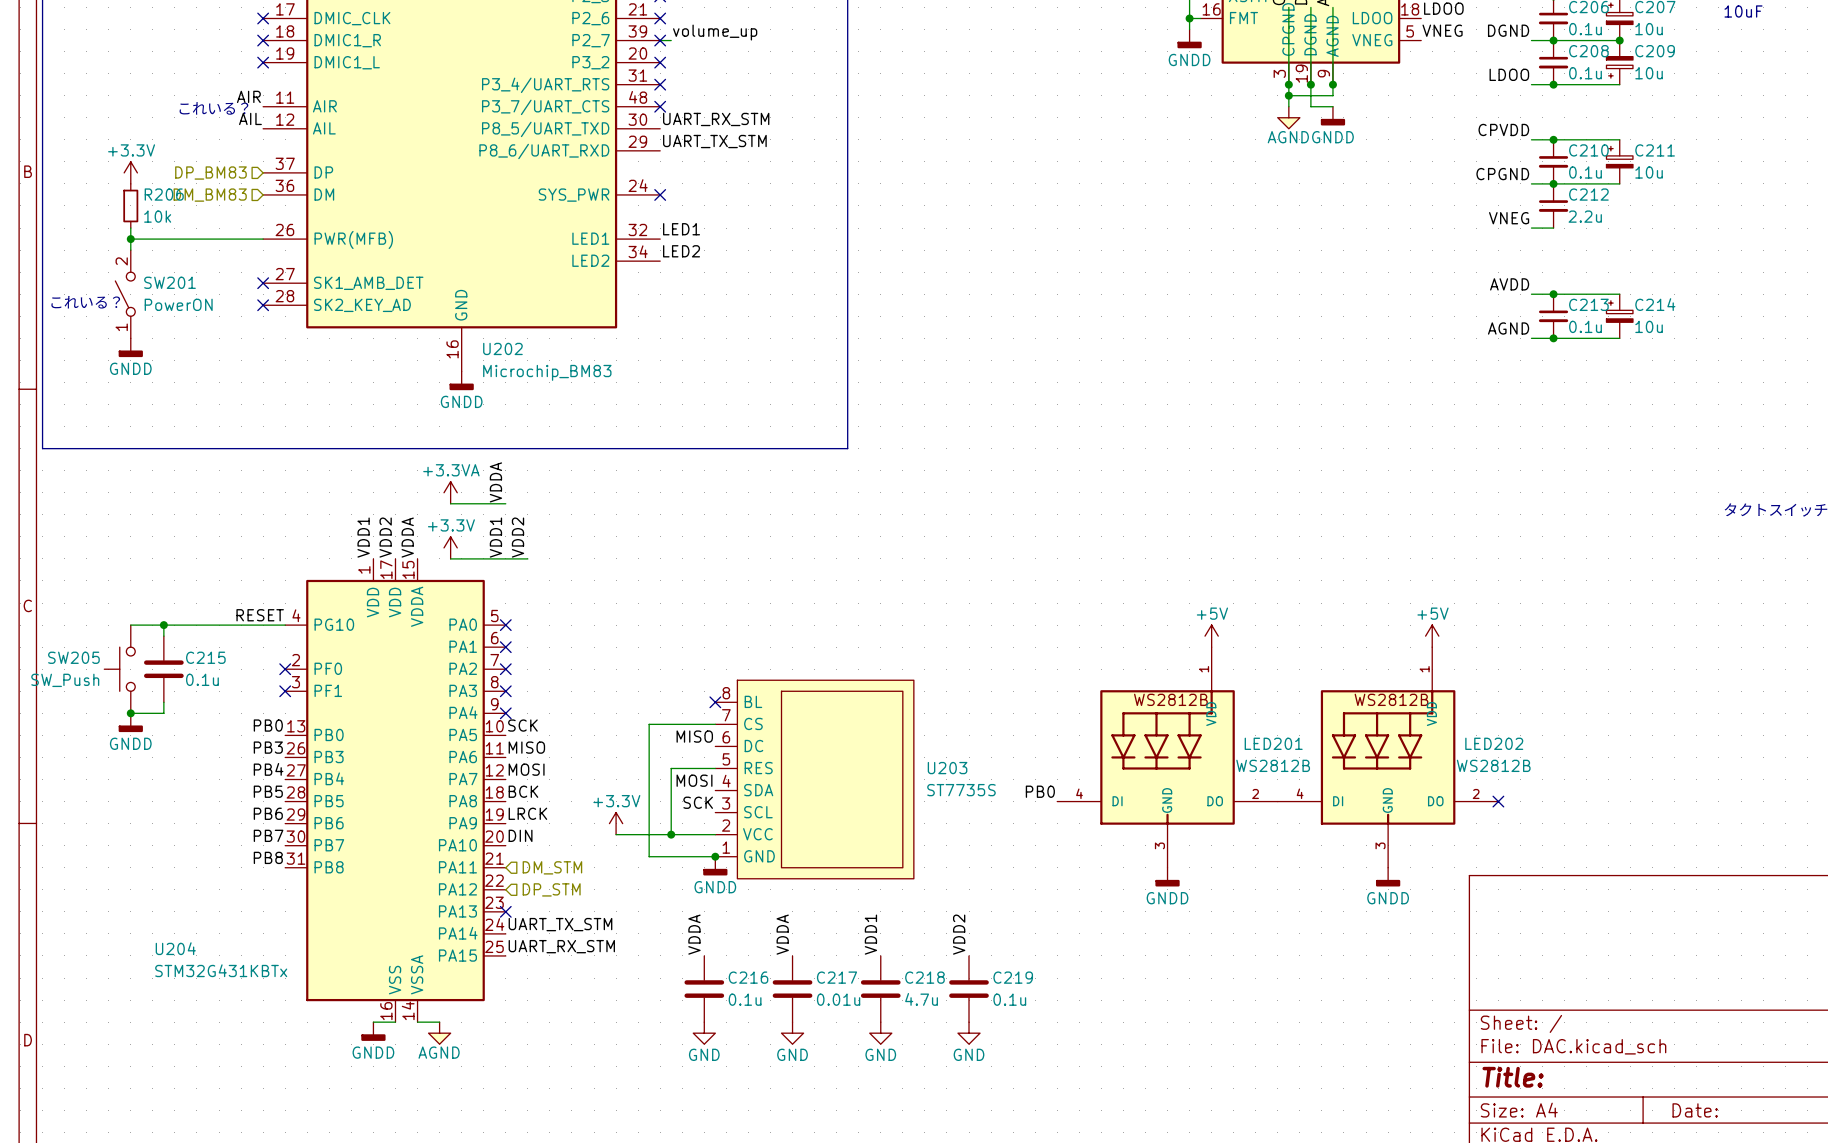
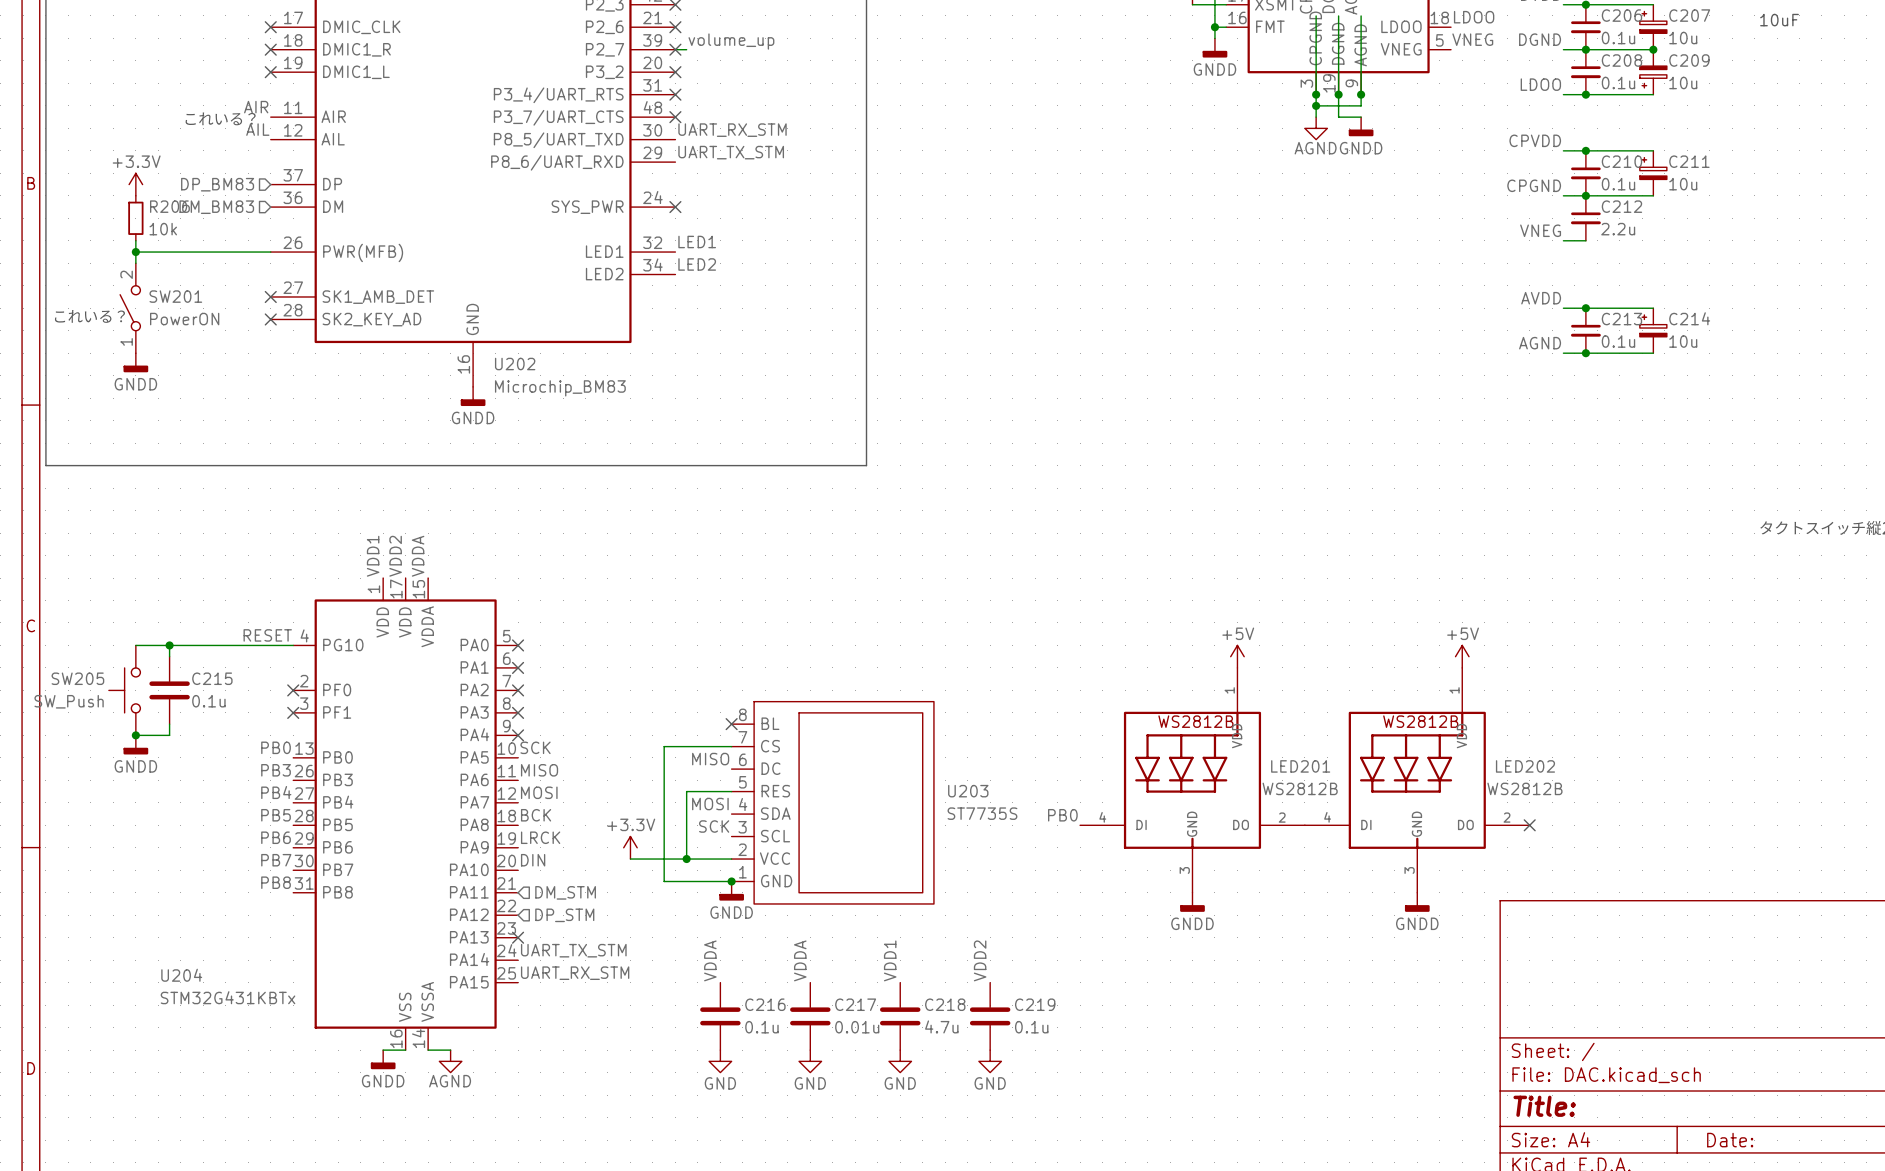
label: VDDA (495, 482) -> none
power symbol: +3.3VA (450, 492) -> none
wire: (450, 503) (505, 503) -> none
label: VDD1 (495, 537) -> none
label: VDD2 (517, 537) -> none
power symbol: +3.3V (450, 547) -> none
wire: (450, 558) (527, 558) -> none

